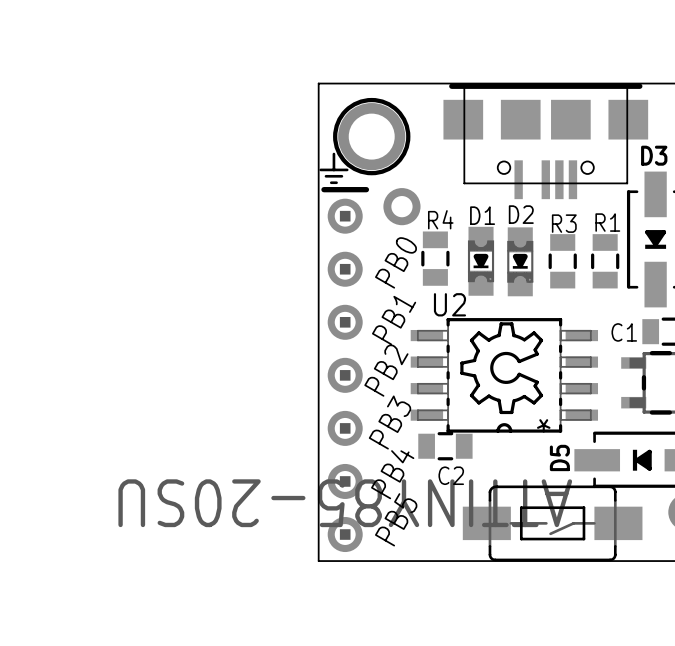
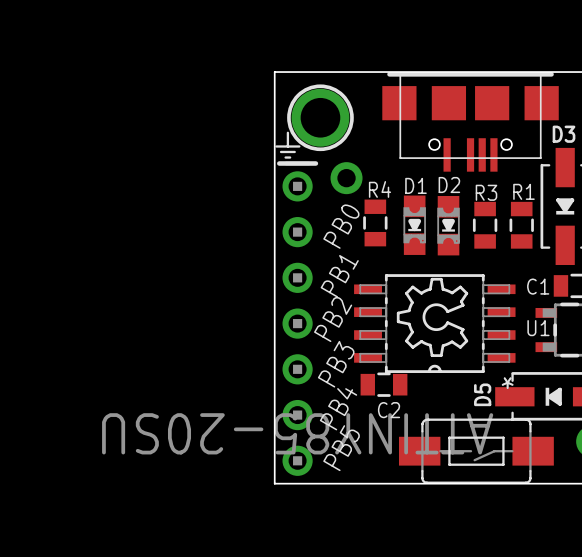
U2 name: U2 (449, 304) -> none
U2 footprint: [410, 318, 599, 433] -> [354, 274, 516, 373]
U1 name: none -> U1 (538, 328)

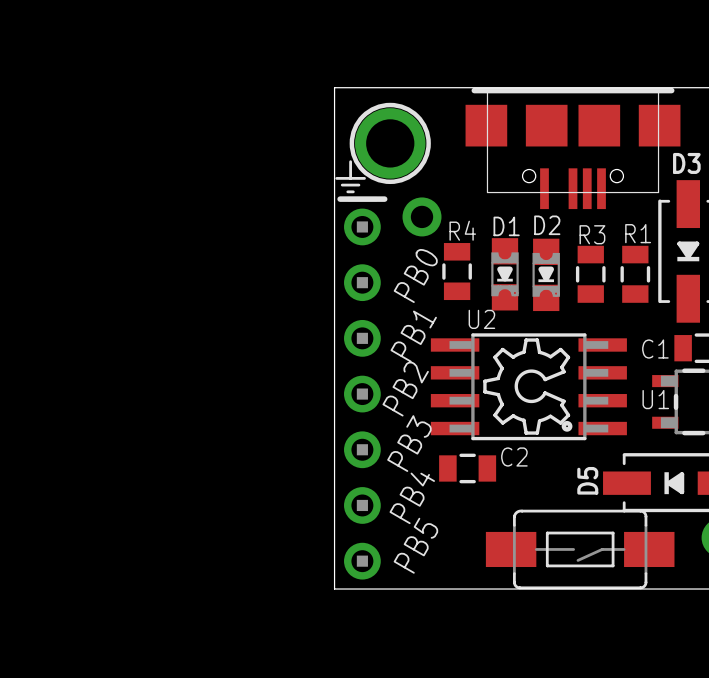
U2: none -> (528, 386)
part: ATTINY85-20SU (434, 323) -> none
C2 name position: C2 (389, 410) -> C2 (514, 457)

